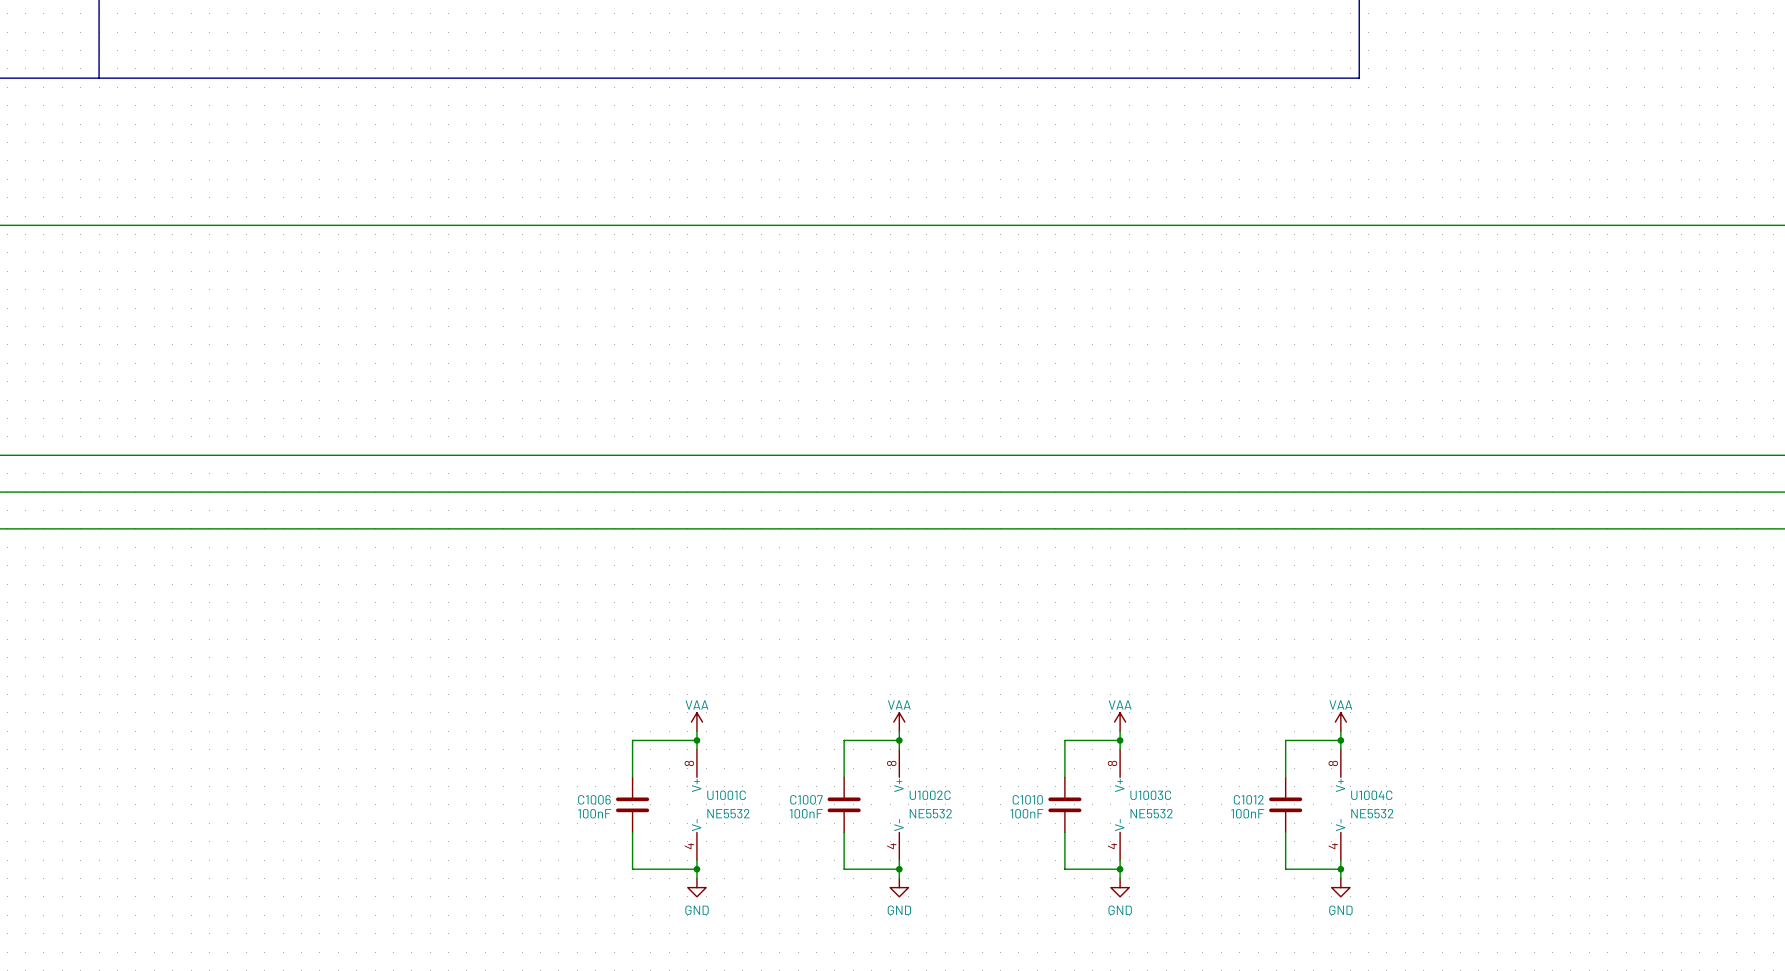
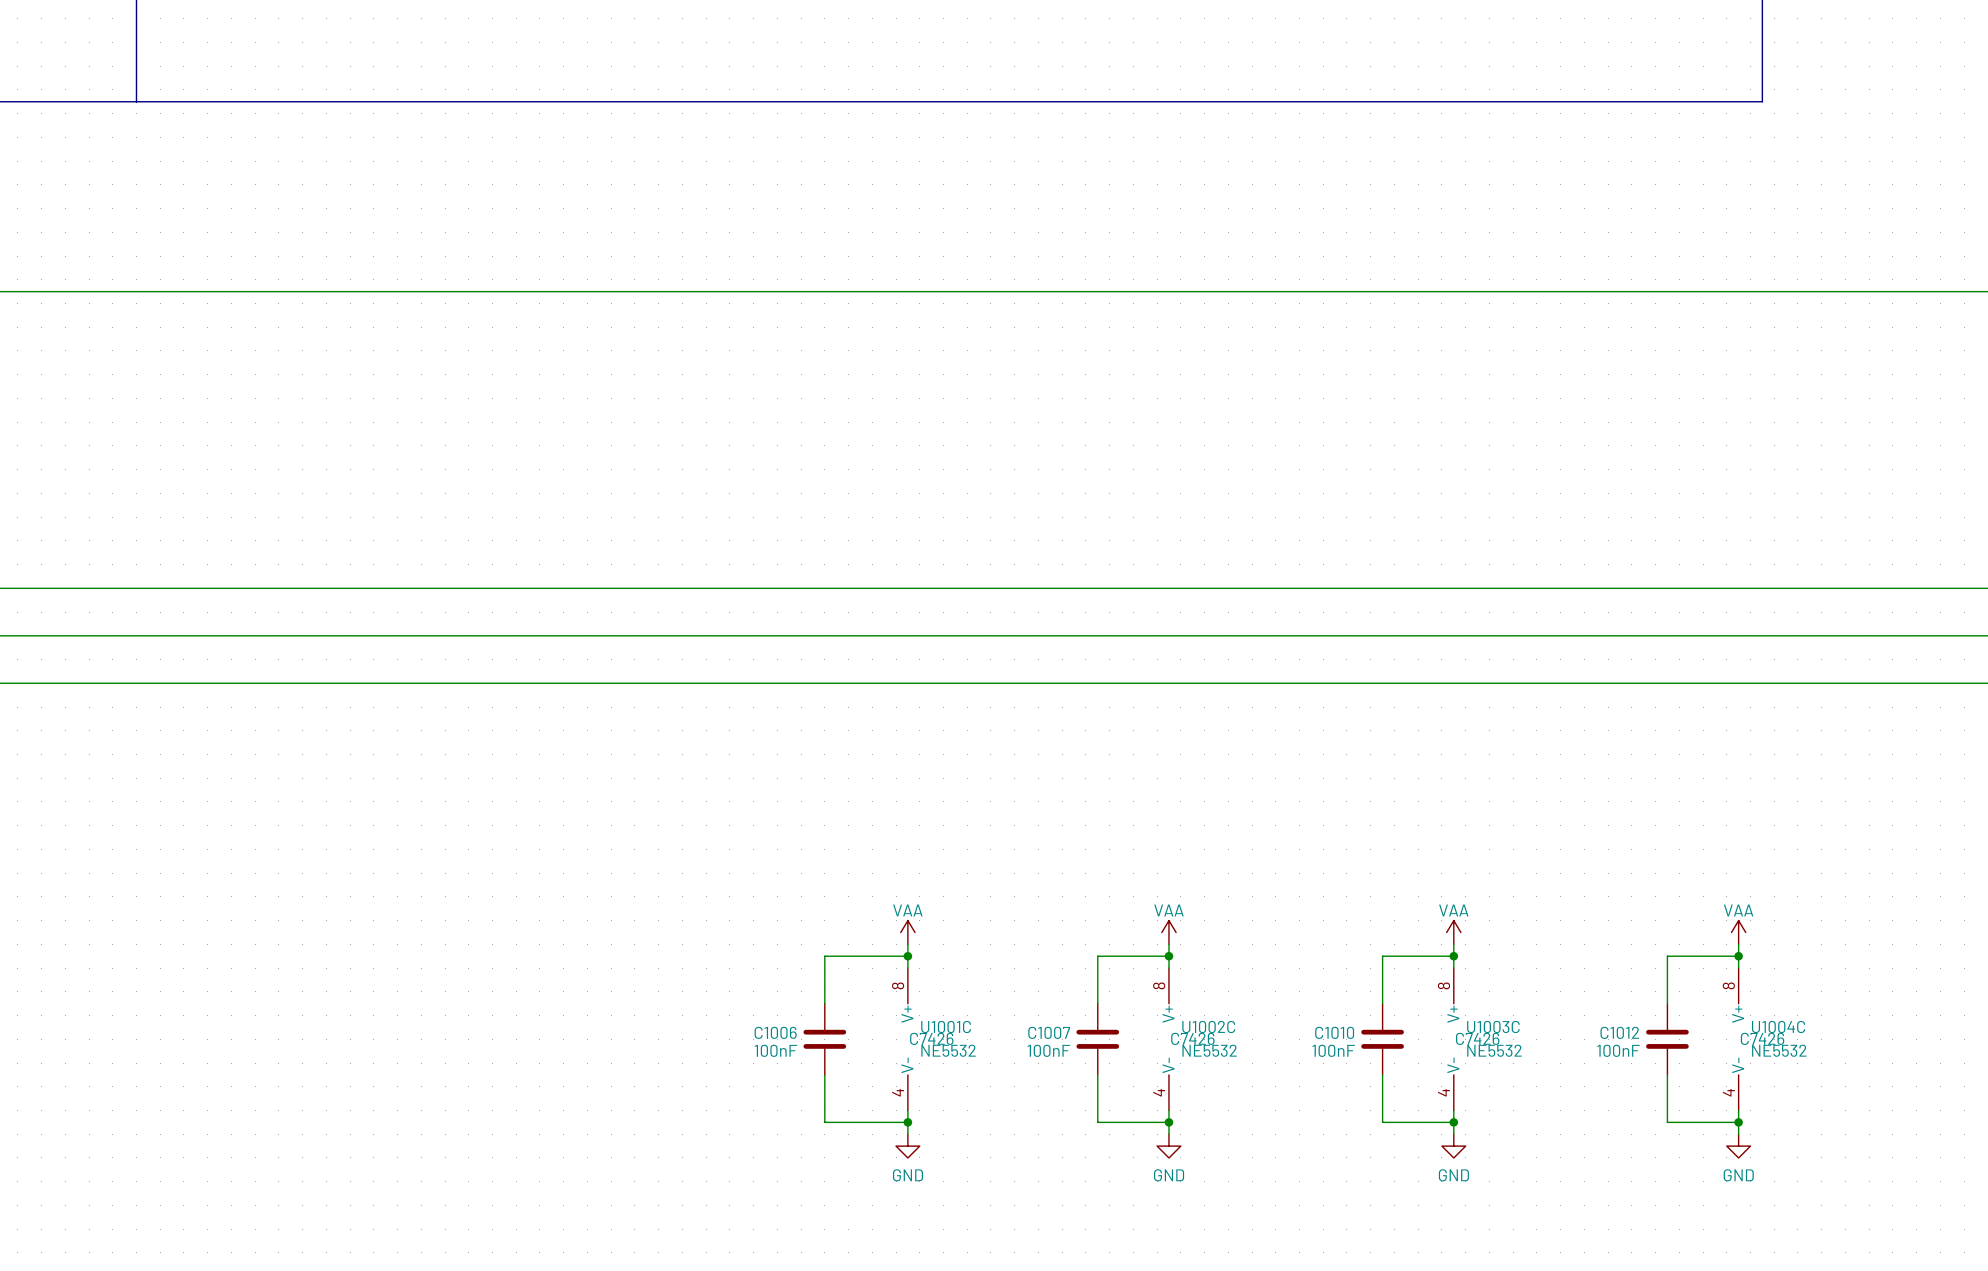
U1001C text: none -> C7426 (931, 1038)
U1002C text: none -> C7426 (1192, 1038)
U1003C text: none -> C7426 (1477, 1038)
U1004C text: none -> C7426 (1762, 1038)

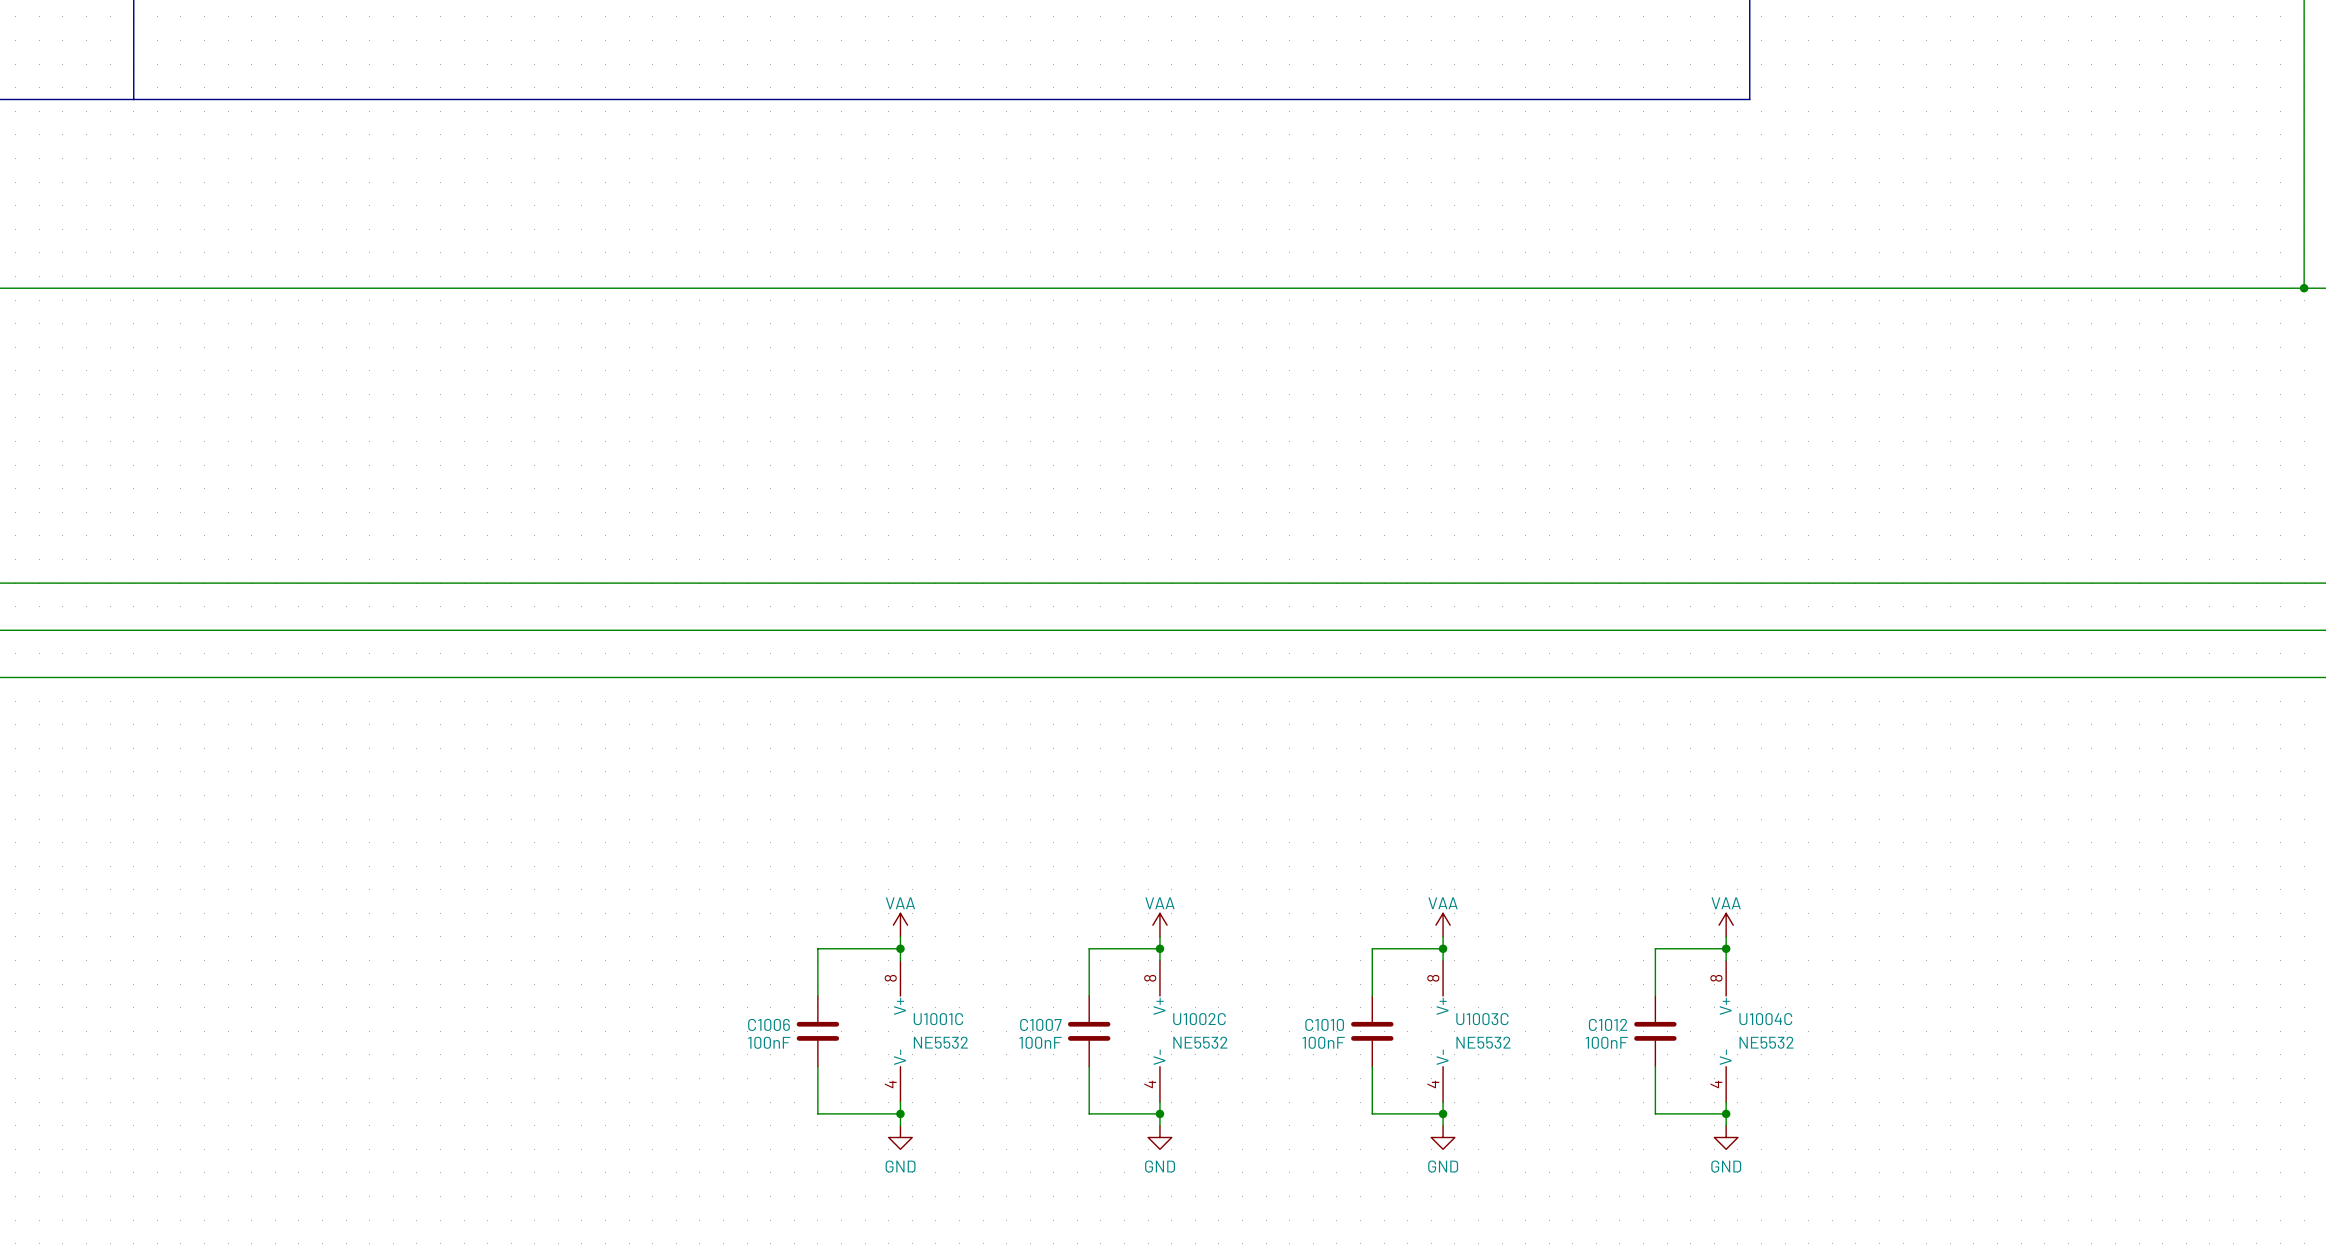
U1001C text: C7426 (931, 1038) -> none
U1002C text: C7426 (1192, 1038) -> none
U1003C text: C7426 (1477, 1038) -> none
U1004C text: C7426 (1762, 1038) -> none

